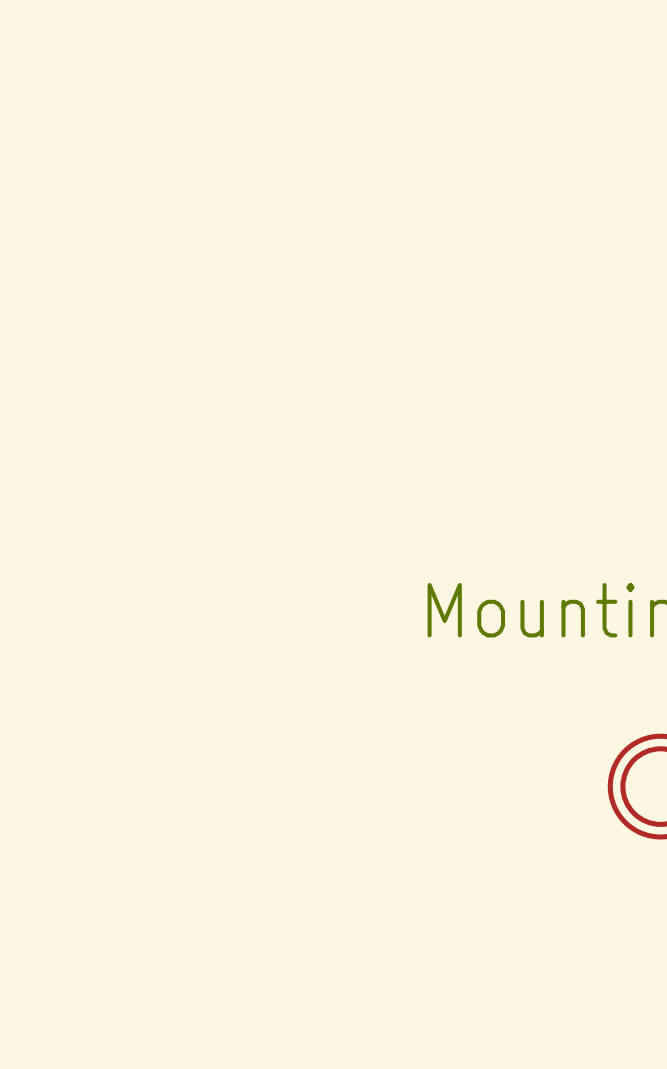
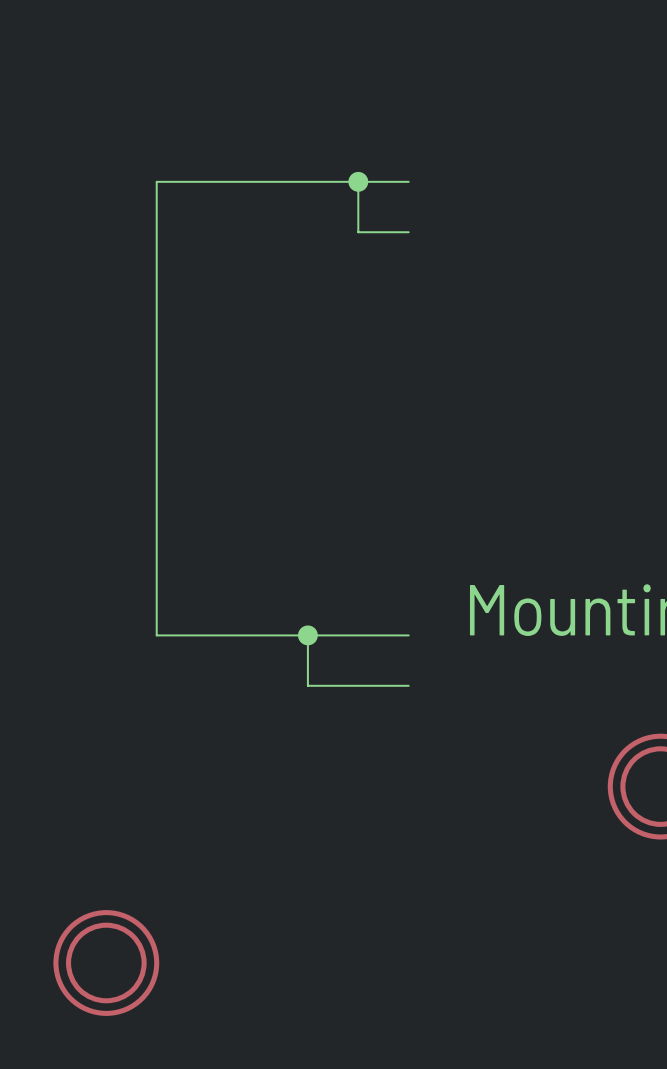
wire: none -> (358, 181) (358, 232) (408, 232)
junction: none -> (358, 181)
wire: none -> (408, 181) (156, 181) (156, 635) (408, 635)
wire: none -> (307, 635) (307, 685) (408, 685)
junction: none -> (307, 635)
part: none -> (106, 962)

